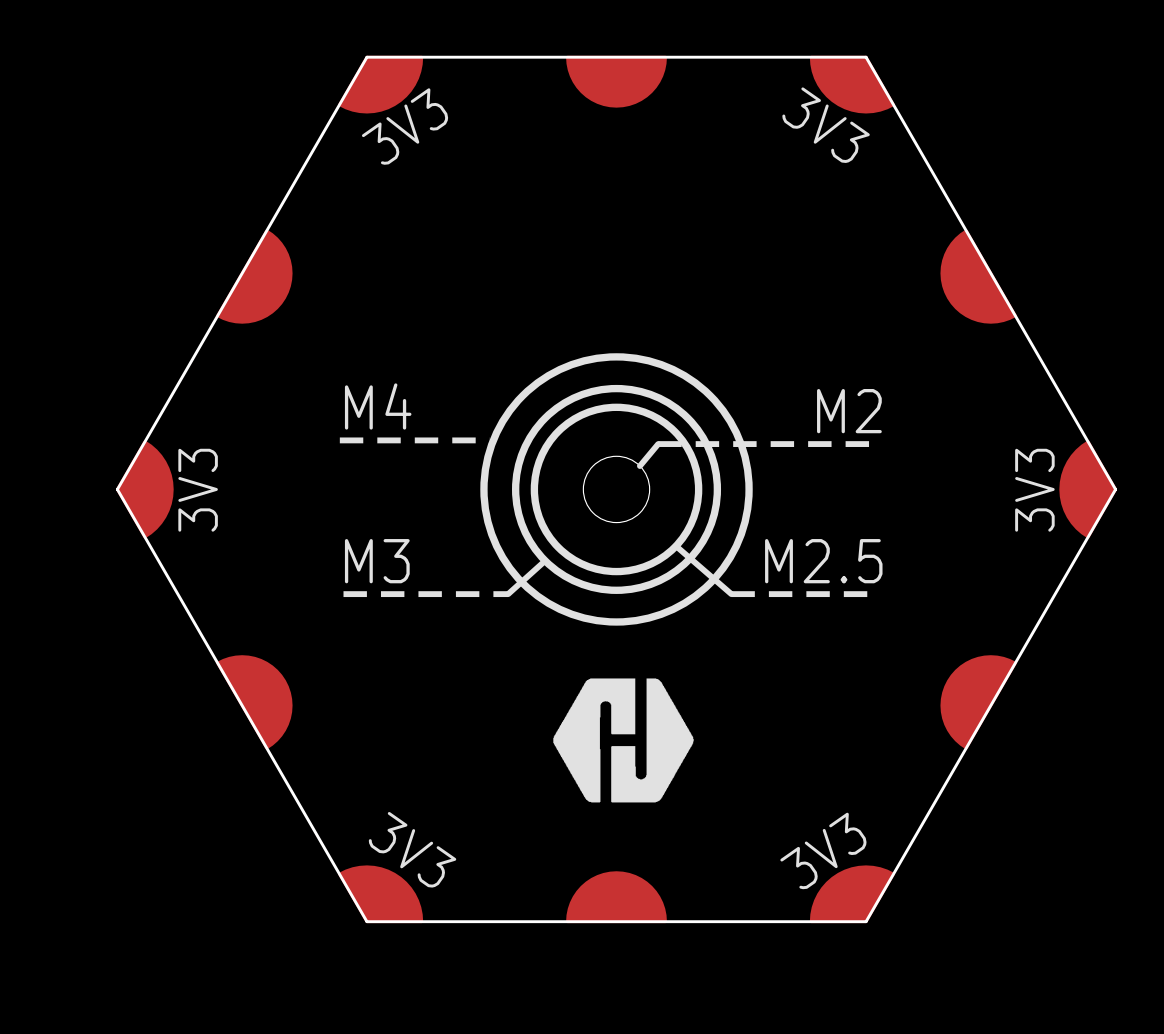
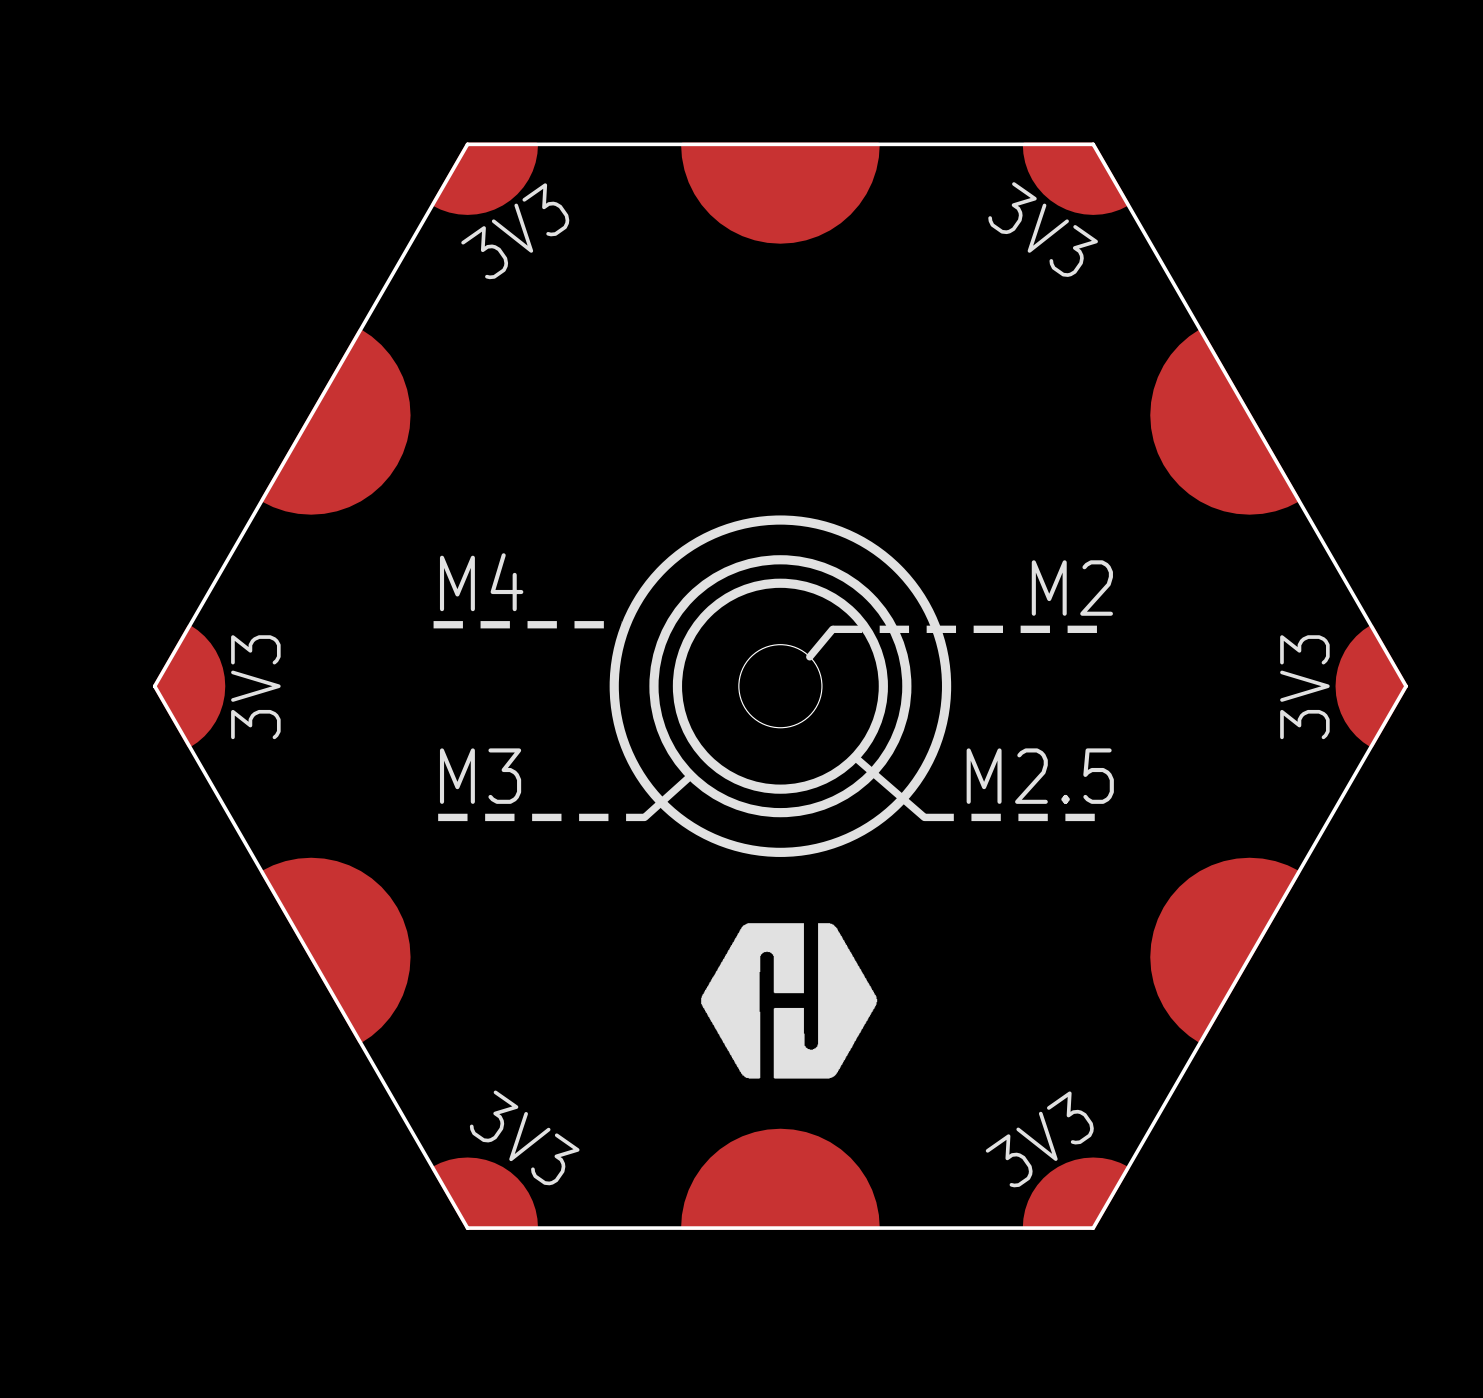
part footprint: [115, 55, 1118, 924] -> [152, 142, 1408, 1230]

